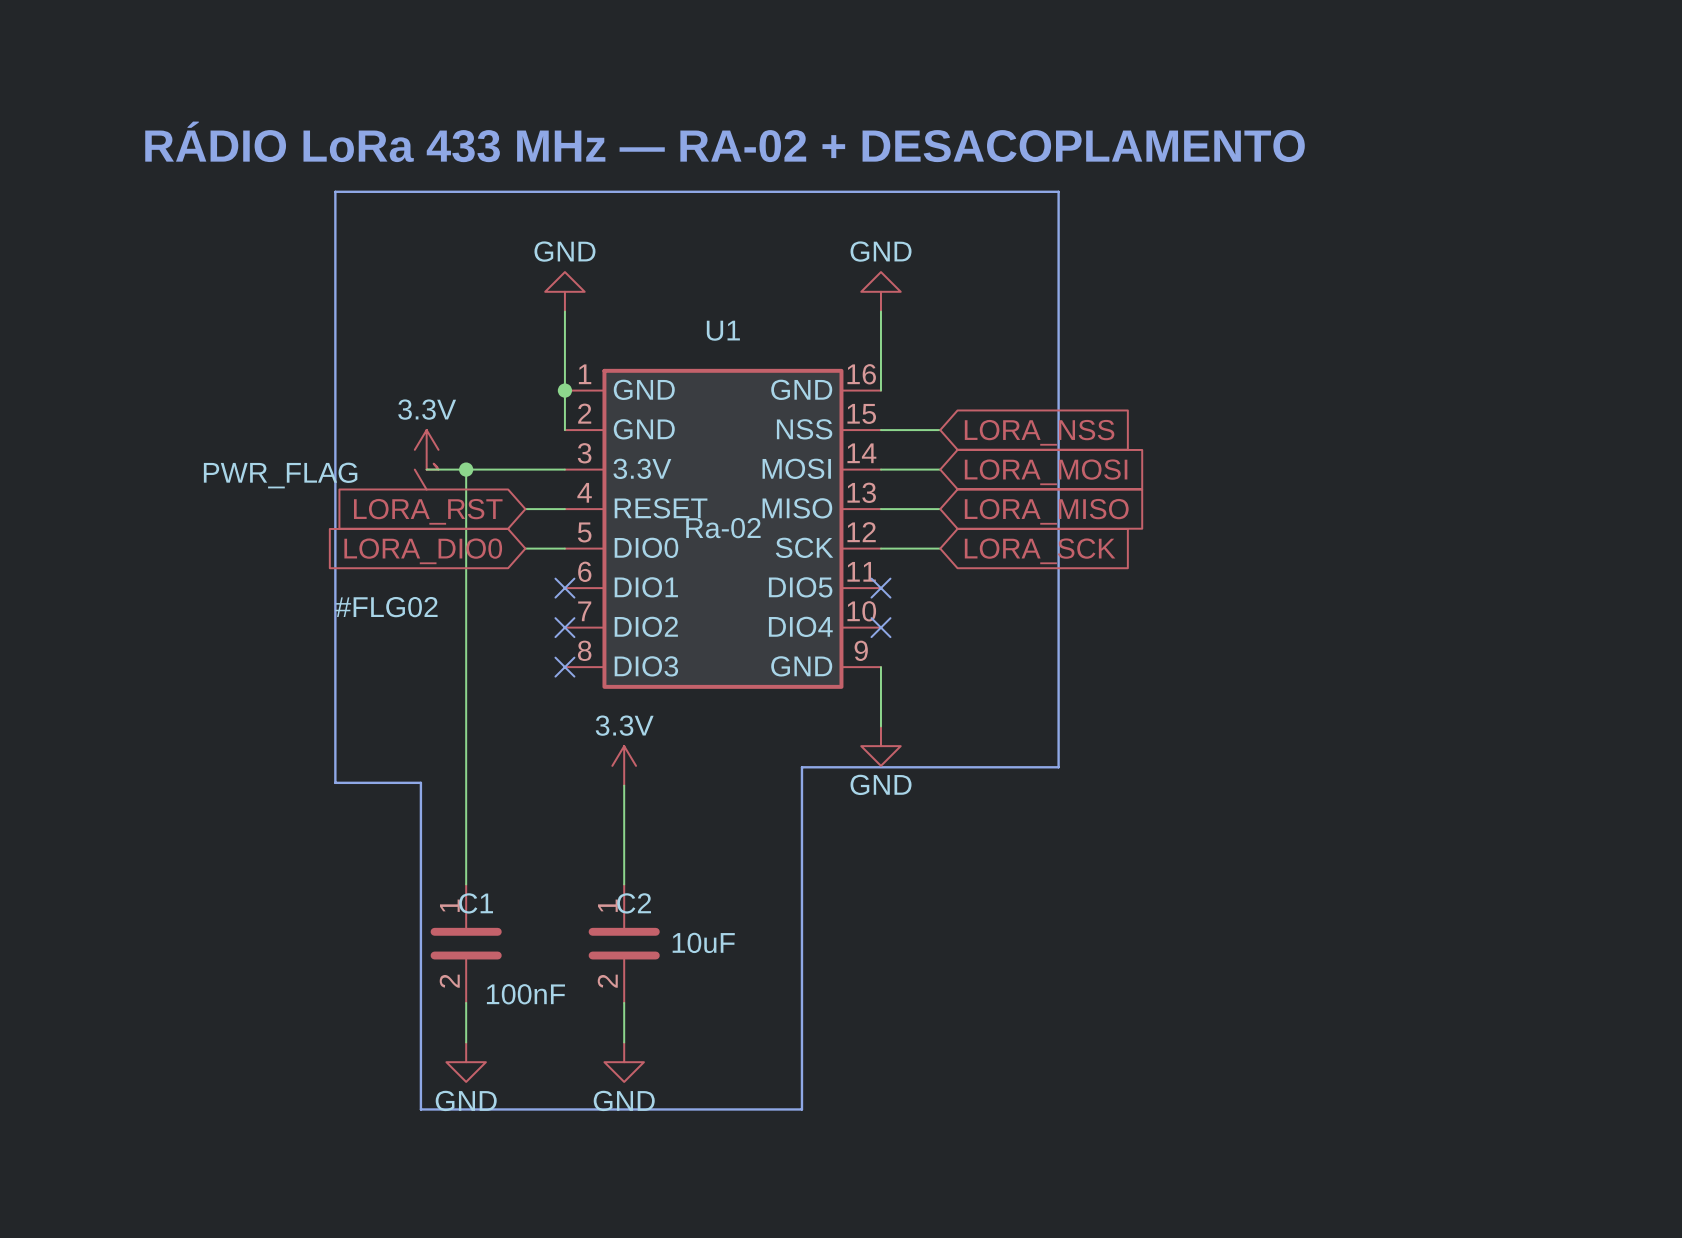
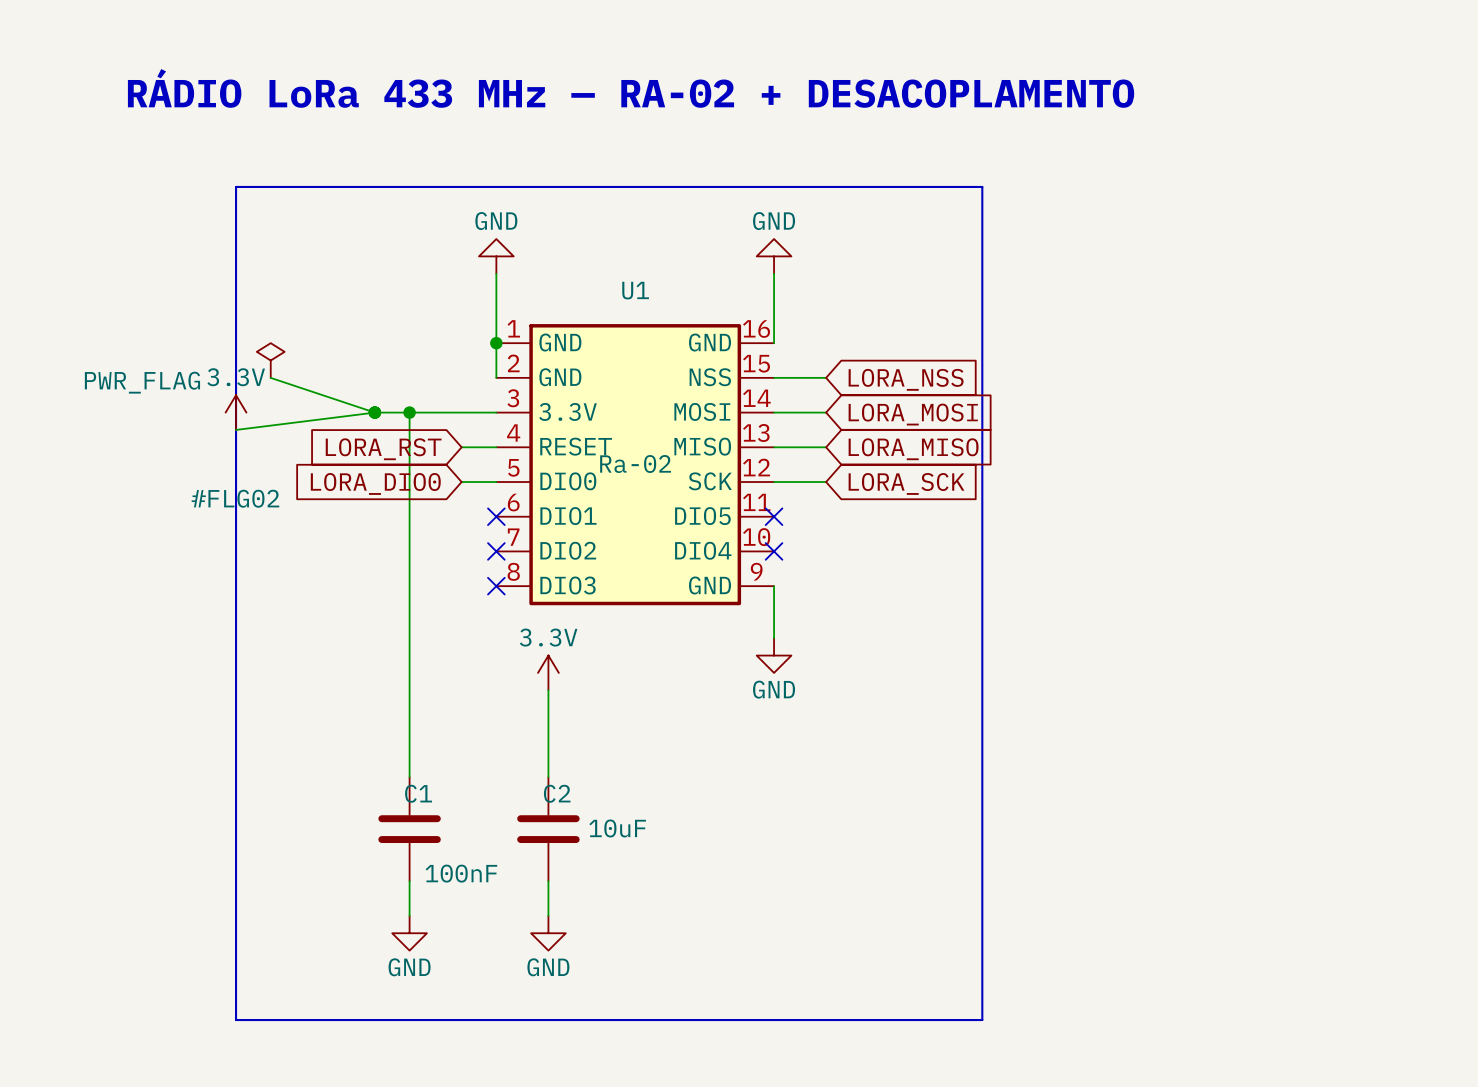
text position: RÁDIO LoRa 433 MHz — RA-02 + DESACOPLAMENTO (725, 141) -> RÁDIO LoRa 433 MHz — RA-02 + DESACOPLAMENTO (631, 88)
line: (335, 191) (1058, 191) (1058, 767) (801, 767) (801, 1109) (420, 1109) (420, 782) (335, 782) (335, 191) -> (236, 186) (236, 1020) (982, 1020) (982, 186) (236, 186)
wire: none -> (270, 377) (374, 412) (236, 429)
power symbol position: 3.3V (426, 449) -> 3.3V (236, 412)
#FLG02 shape: [414, 463, 440, 490] -> [256, 343, 285, 378]
junction: none -> (374, 412)
C1 pin number: 1 (449, 905) -> none
C2 pin number: 1 (607, 905) -> none
C1 pin number: 2 (449, 981) -> none
C2 pin number: 2 (607, 981) -> none

